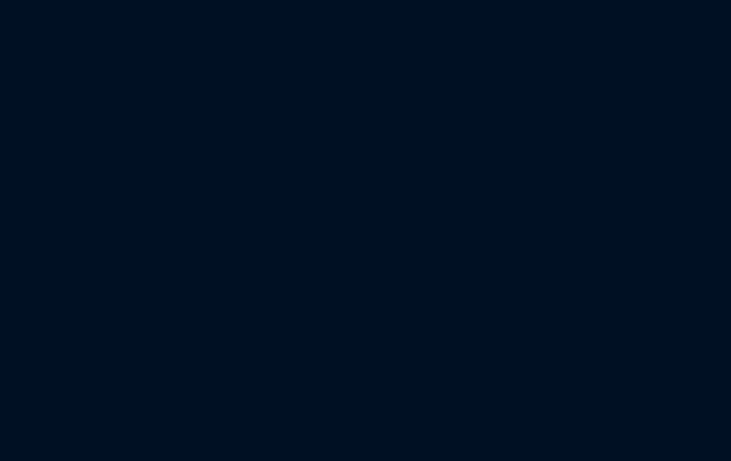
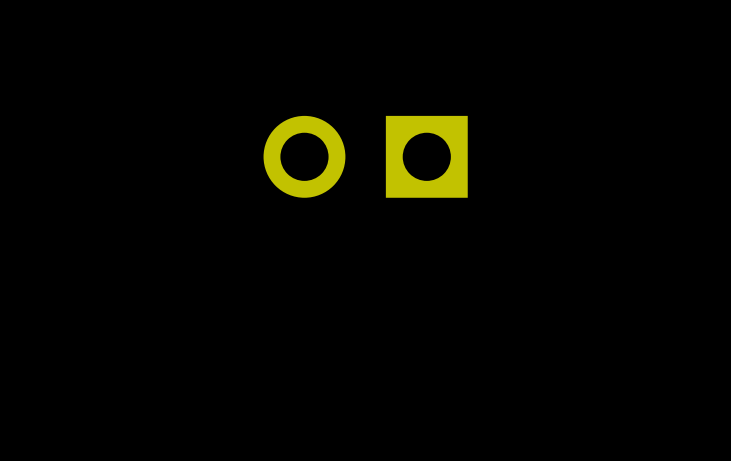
part: none -> (365, 156)

